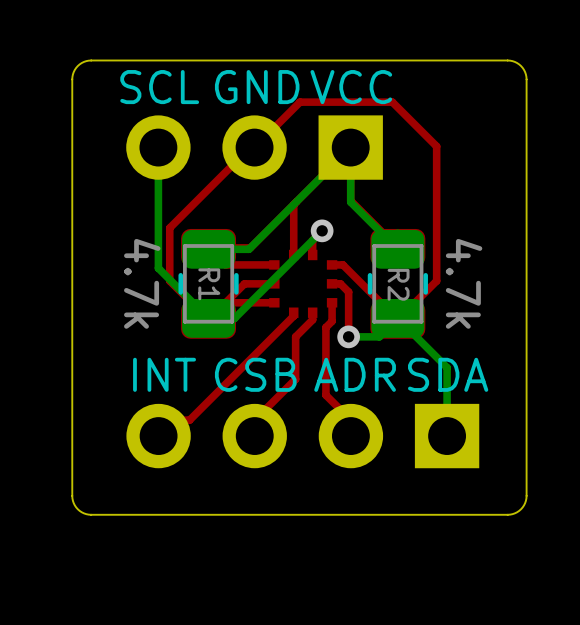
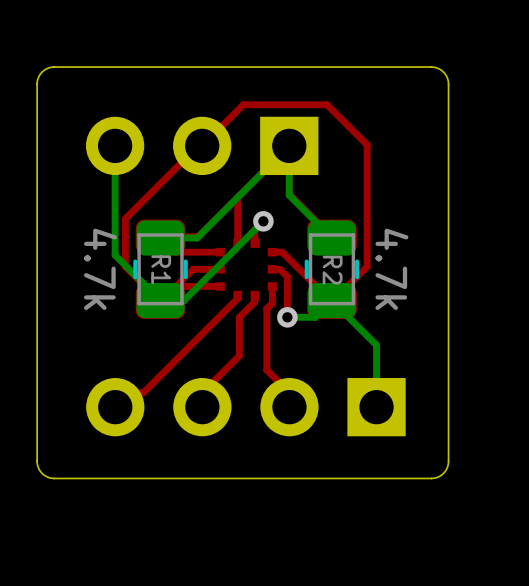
text: SCL (159, 87) -> none
text: GND (257, 87) -> none
text: VCC (351, 87) -> none
text: INT (164, 374) -> none
text: CSB (255, 374) -> none
text: ADR (355, 374) -> none
text: SDA (448, 374) -> none

